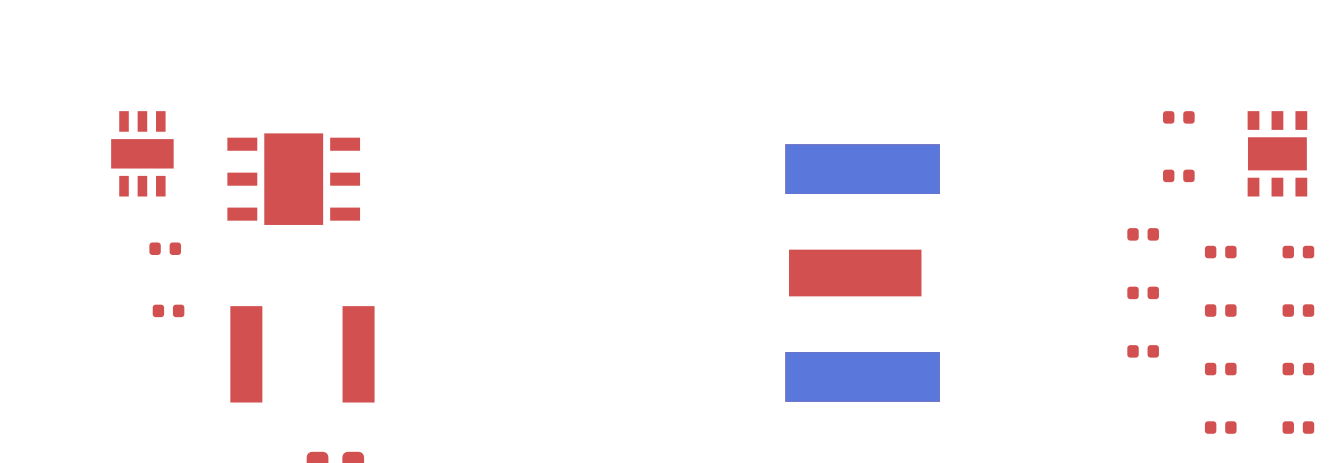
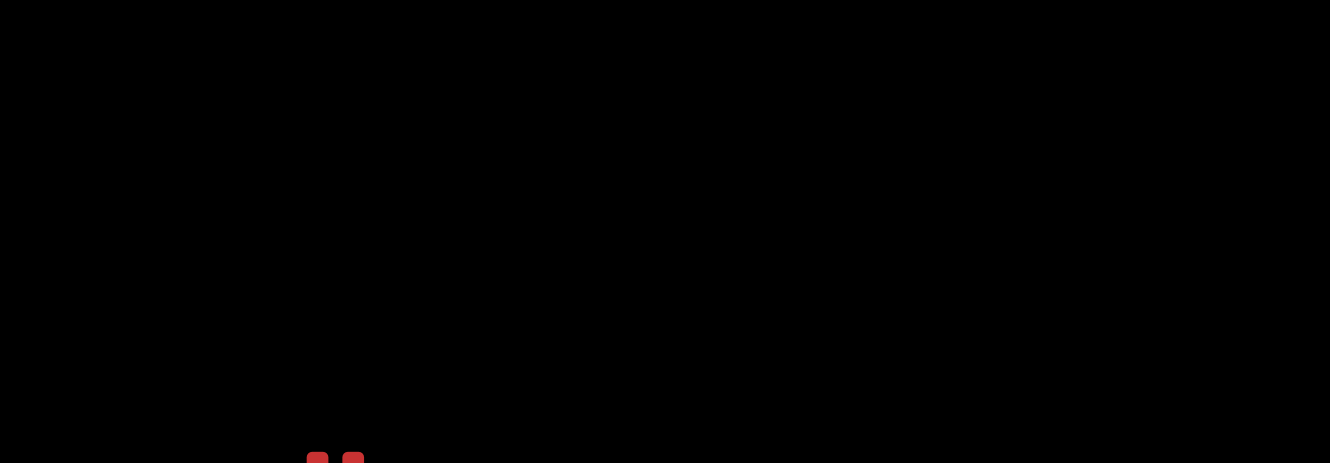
part: (1178, 117) -> none
part: (142, 153) -> none
part: (1277, 153) -> none
part: (1178, 175) -> none
part: (293, 179) -> none
part: (1143, 234) -> none
part: (165, 248) -> none
part: (1220, 252) -> none
part: (1298, 252) -> none
part: (862, 273) -> none
part: (1143, 292) -> none
part: (168, 310) -> none
part: (1220, 310) -> none
part: (1298, 310) -> none
part: (1143, 351) -> none
part: (302, 354) -> none
part: (1220, 369) -> none
part: (1298, 369) -> none
part: (1220, 427) -> none
part: (1298, 427) -> none

